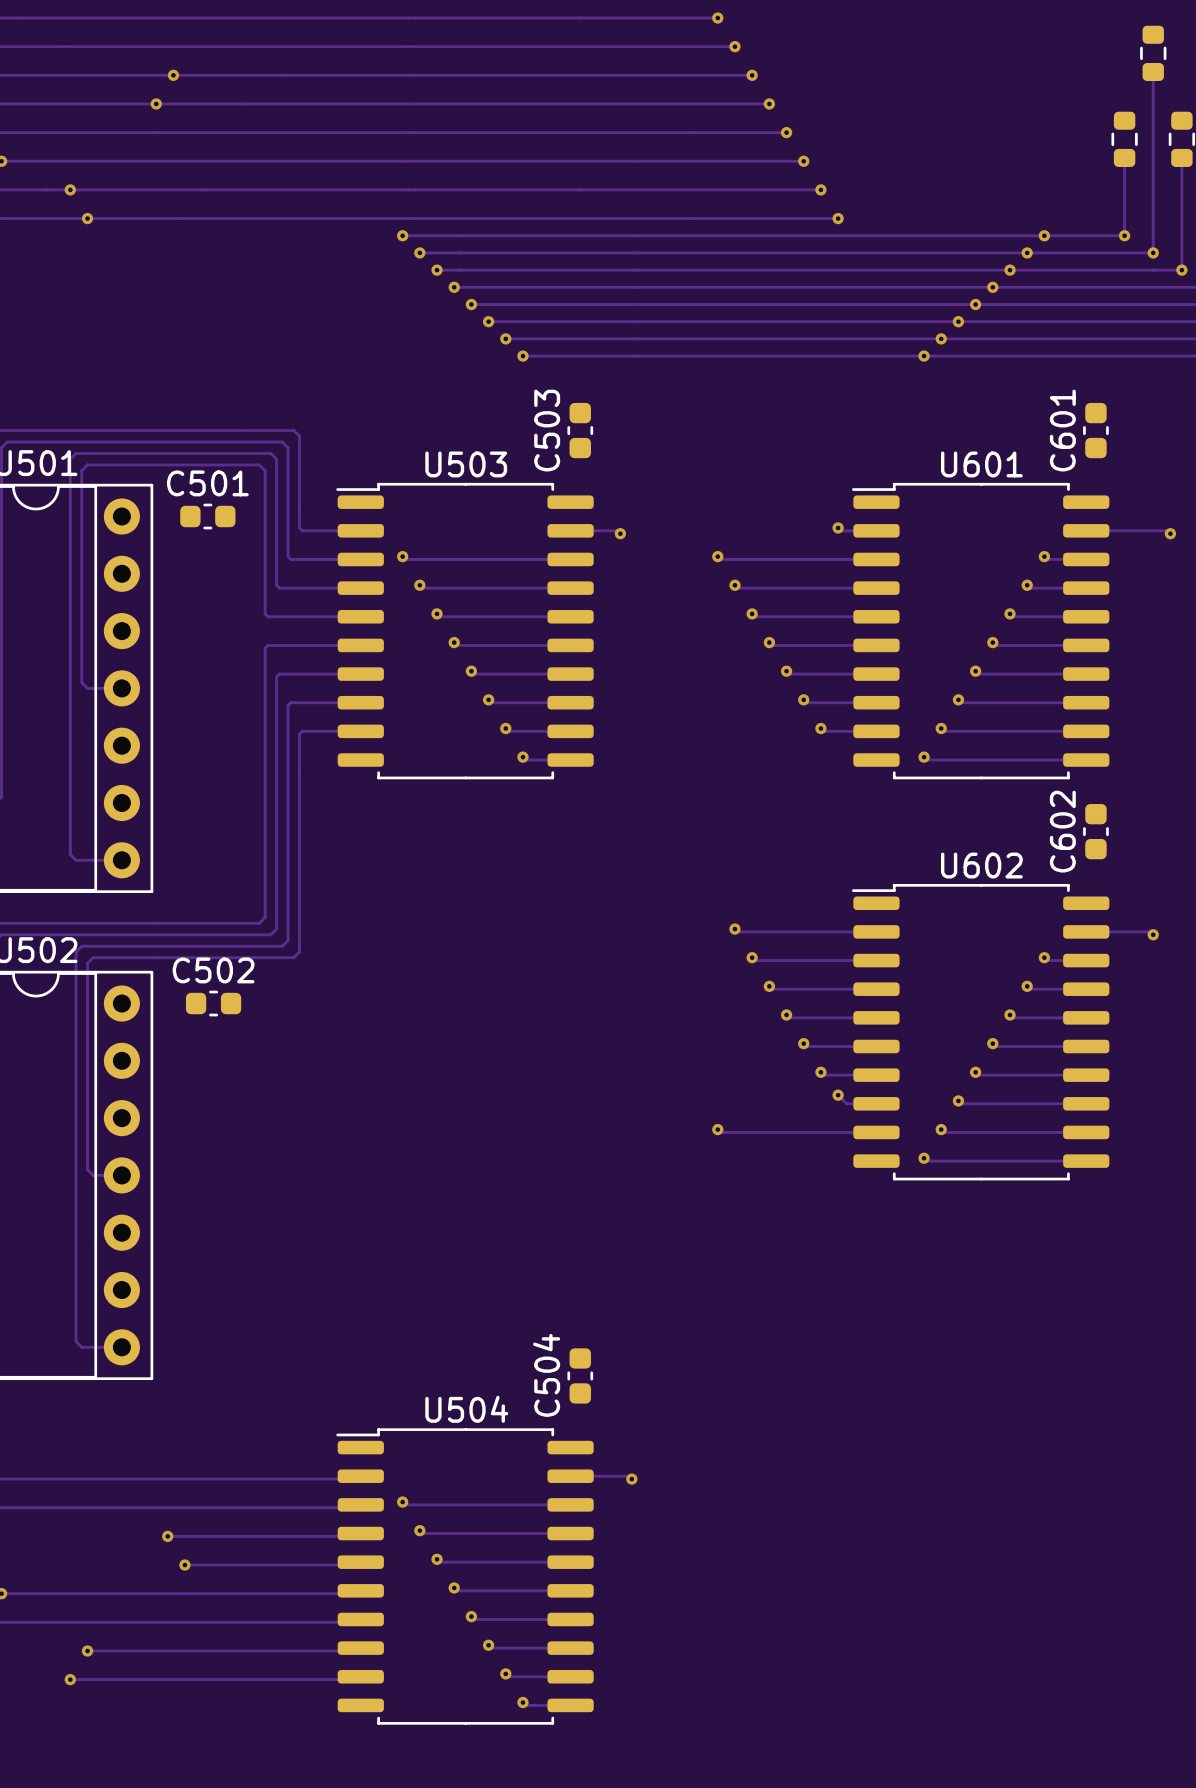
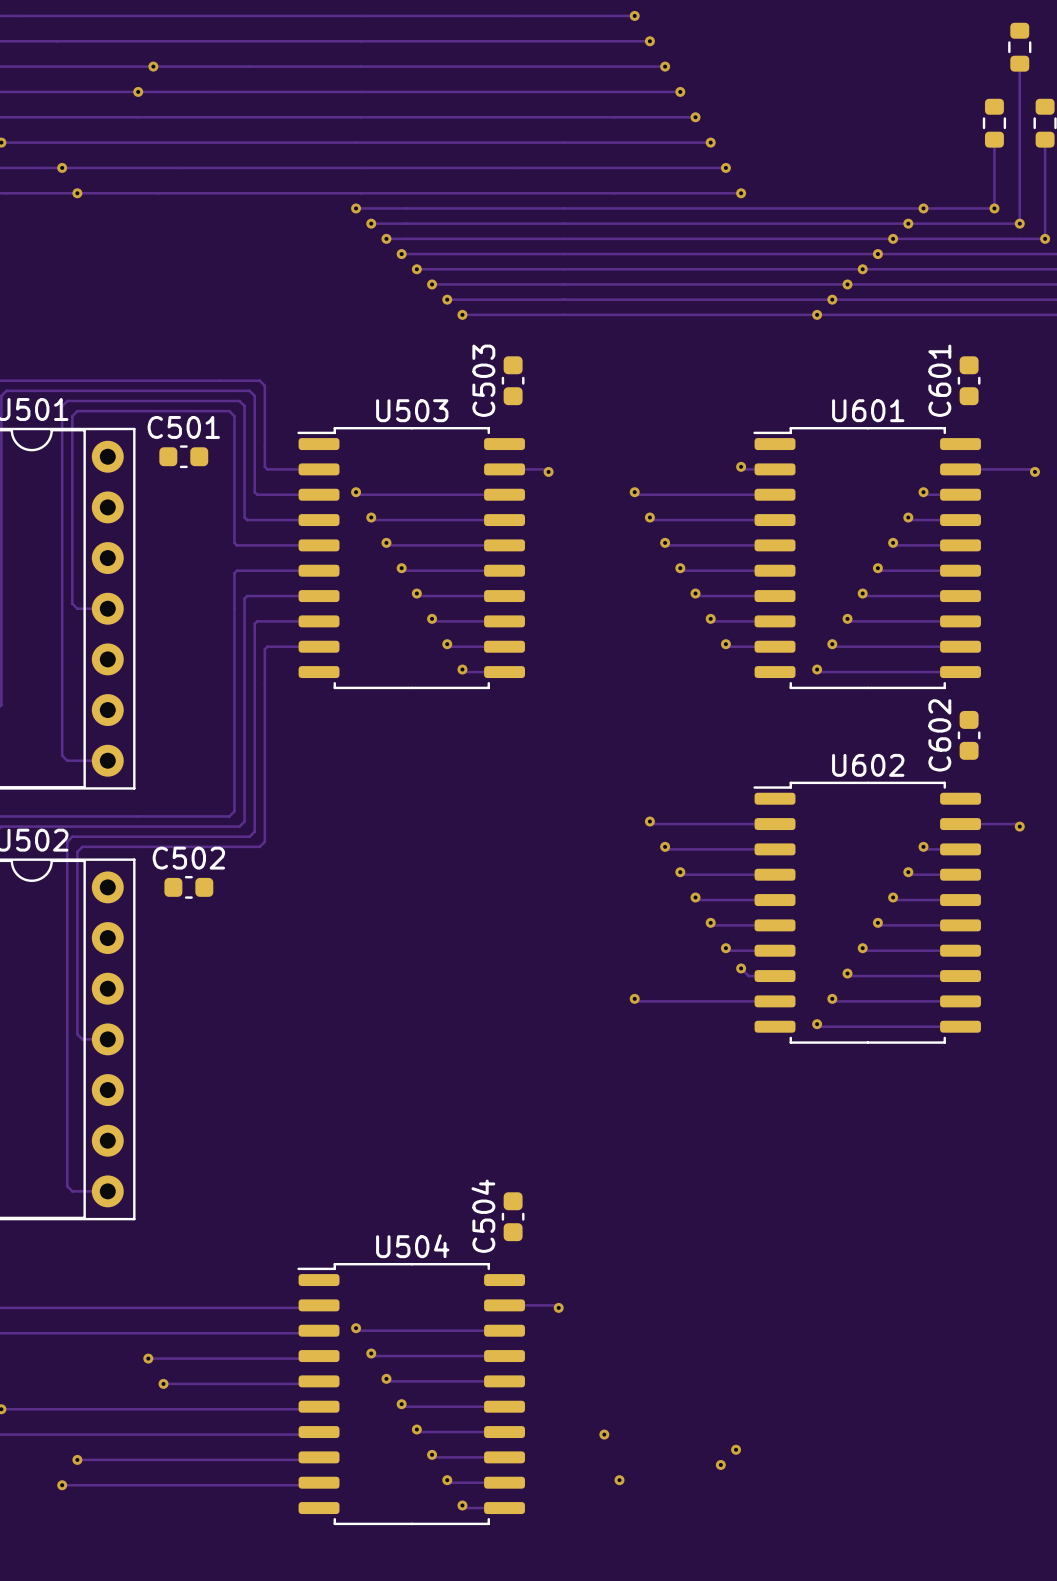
via: none -> (604, 1434)
via: none -> (736, 1449)
via: none -> (720, 1464)
via: none -> (619, 1480)

